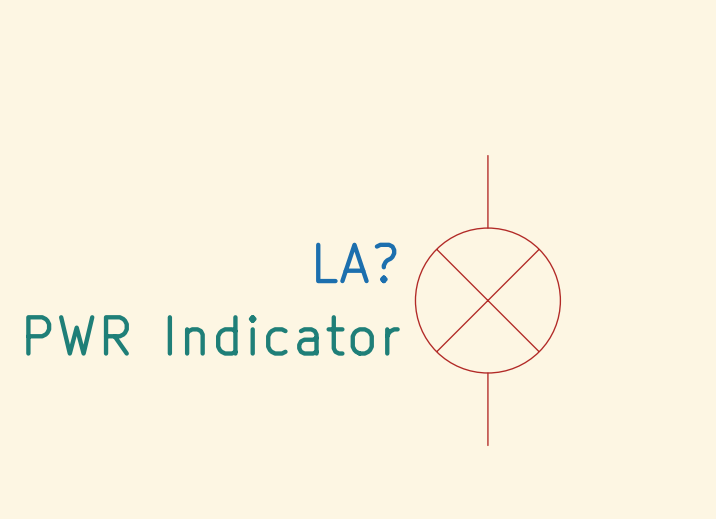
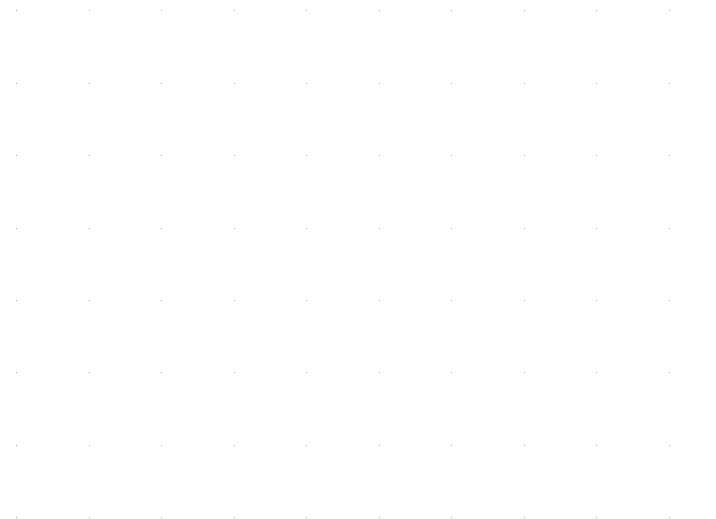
LA?: PWR Indicator (487, 300) -> none

